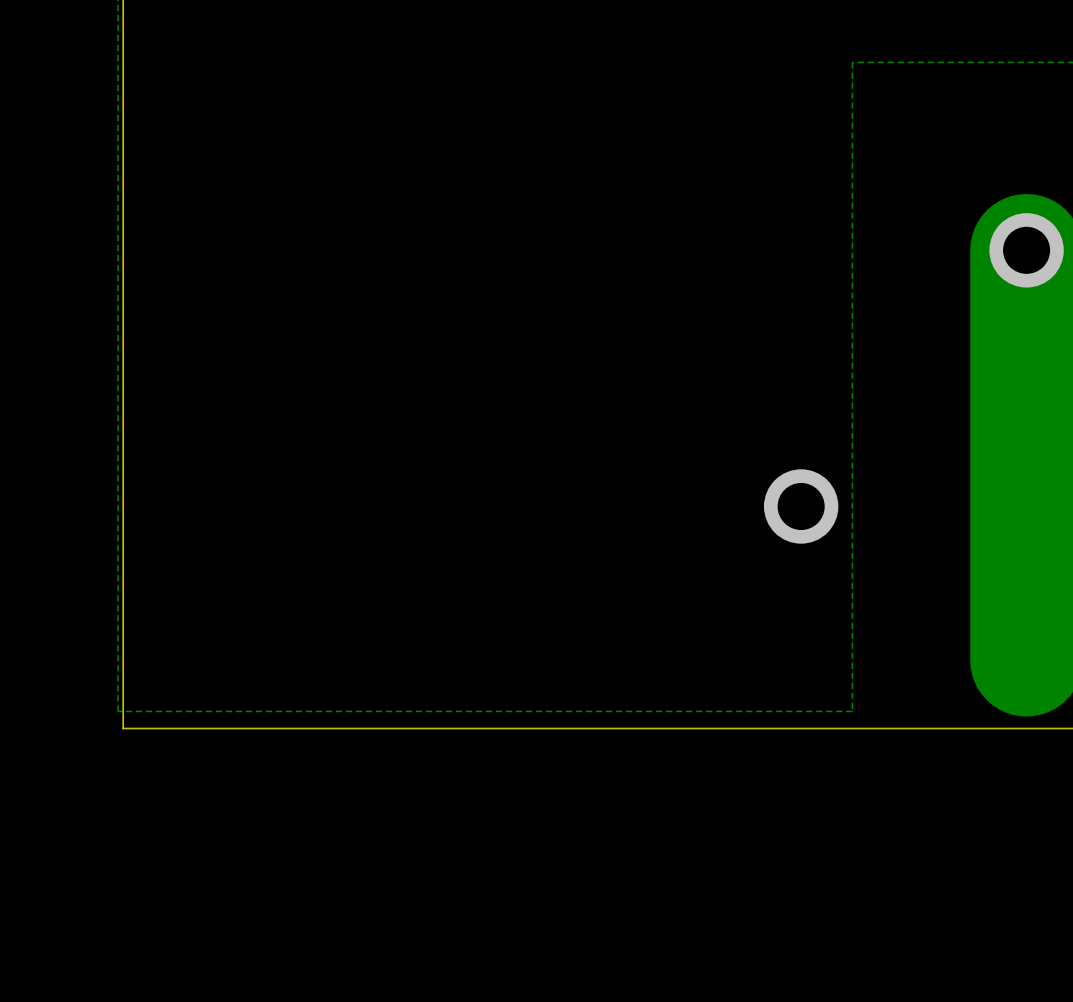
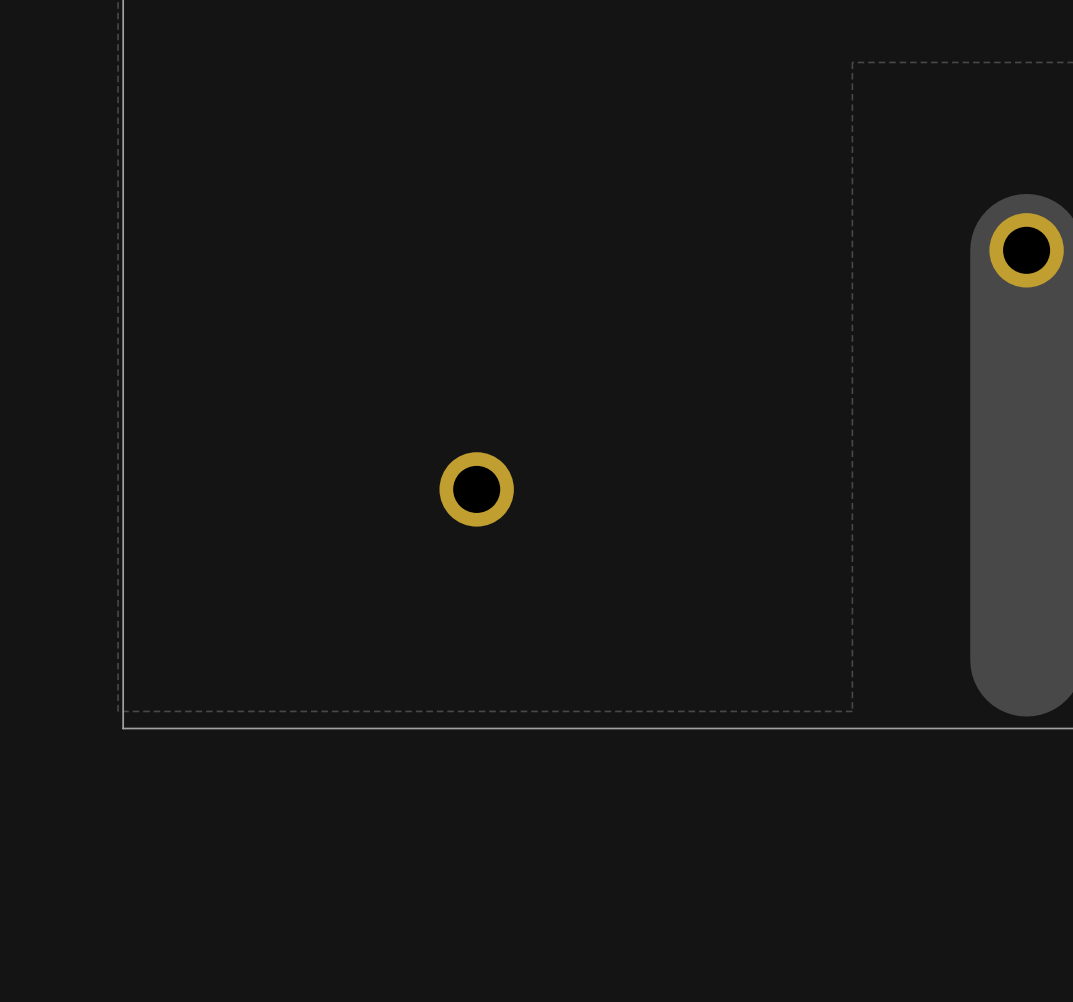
via position: (801, 506) -> (476, 489)

